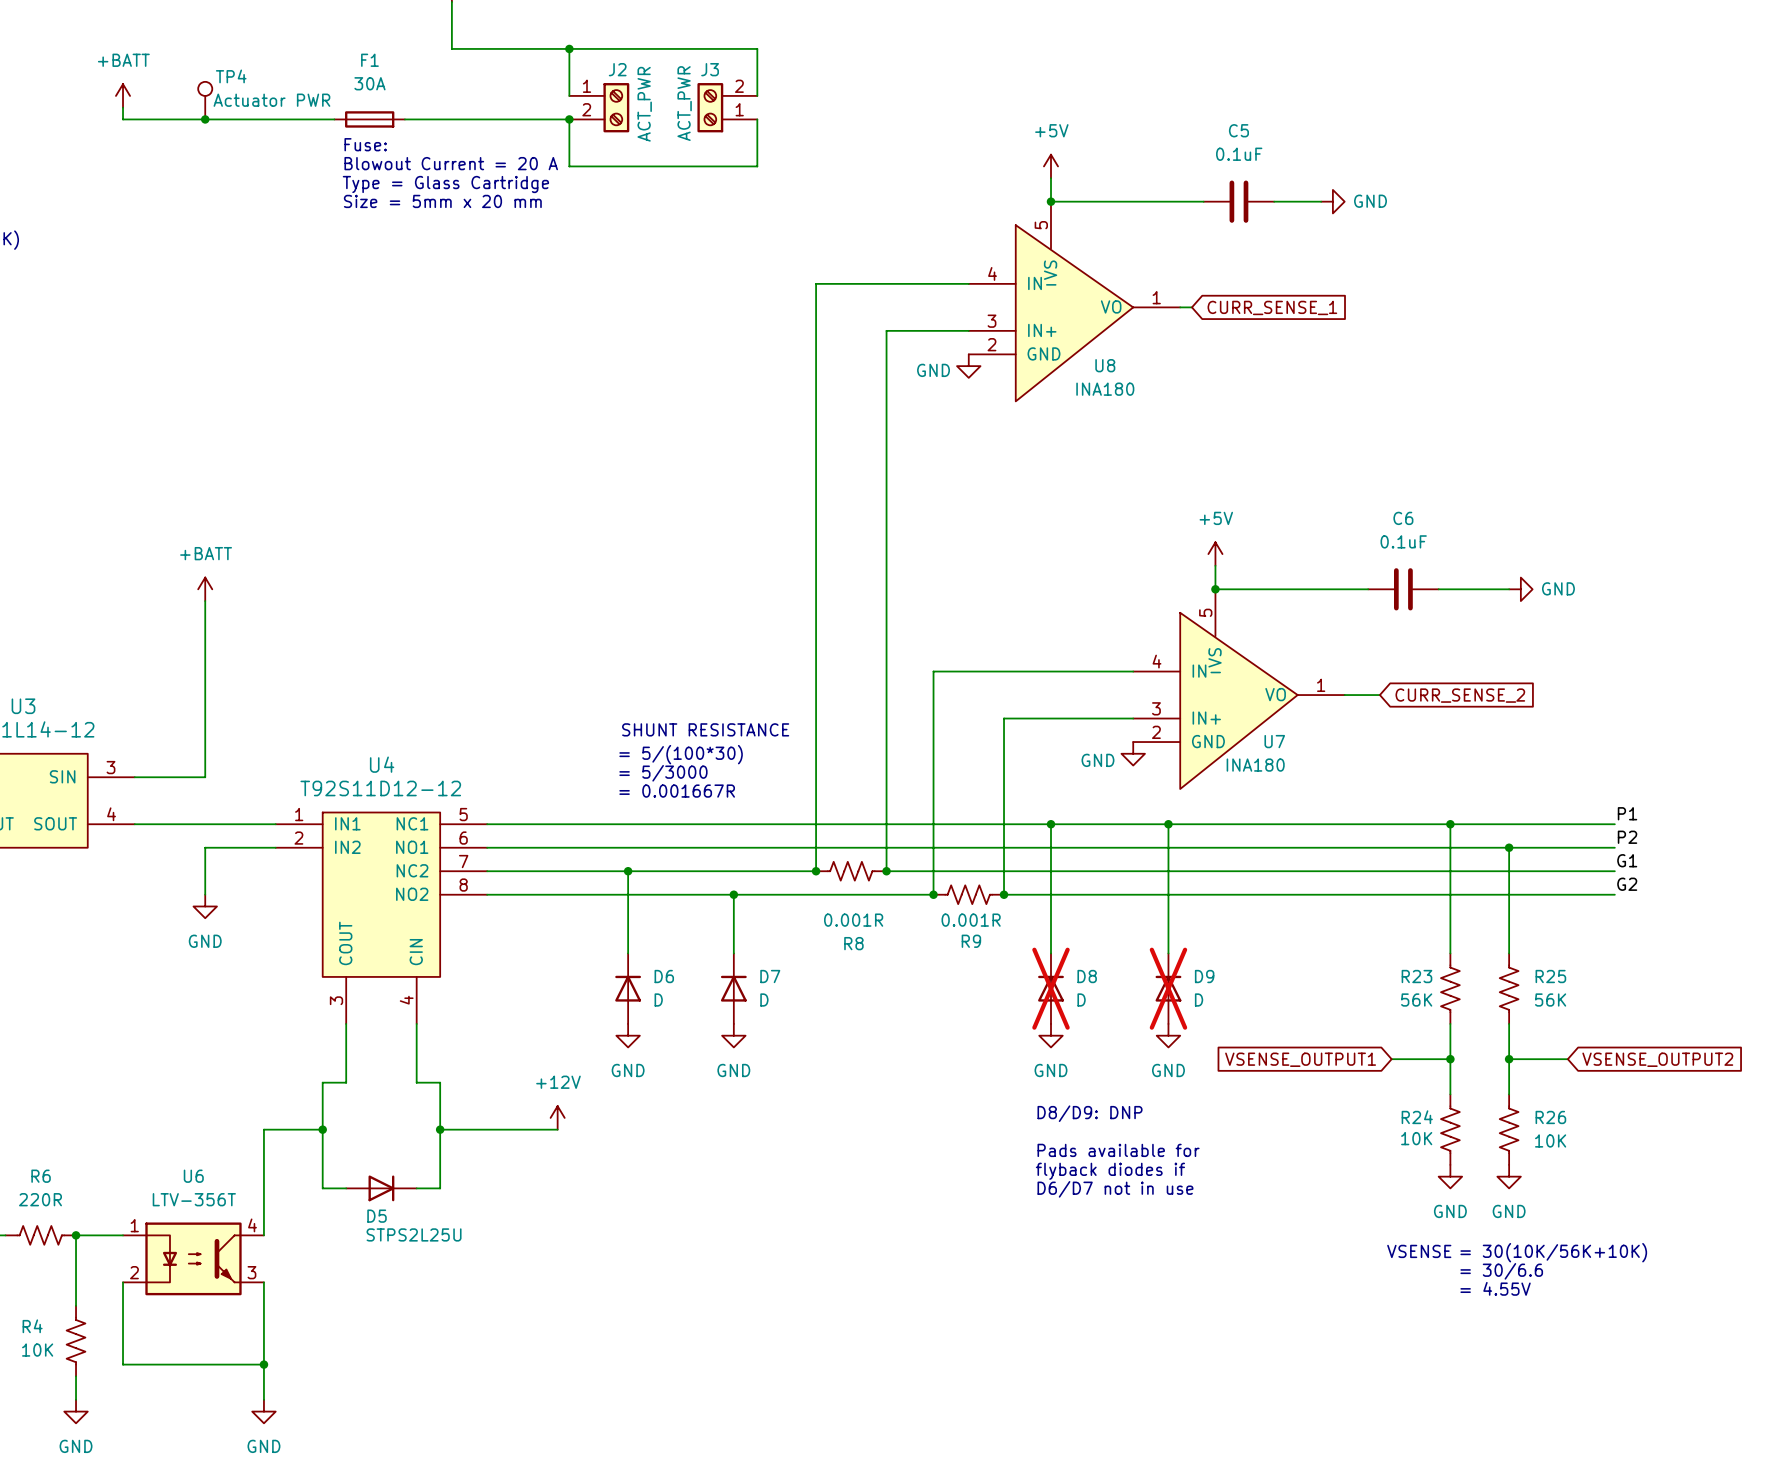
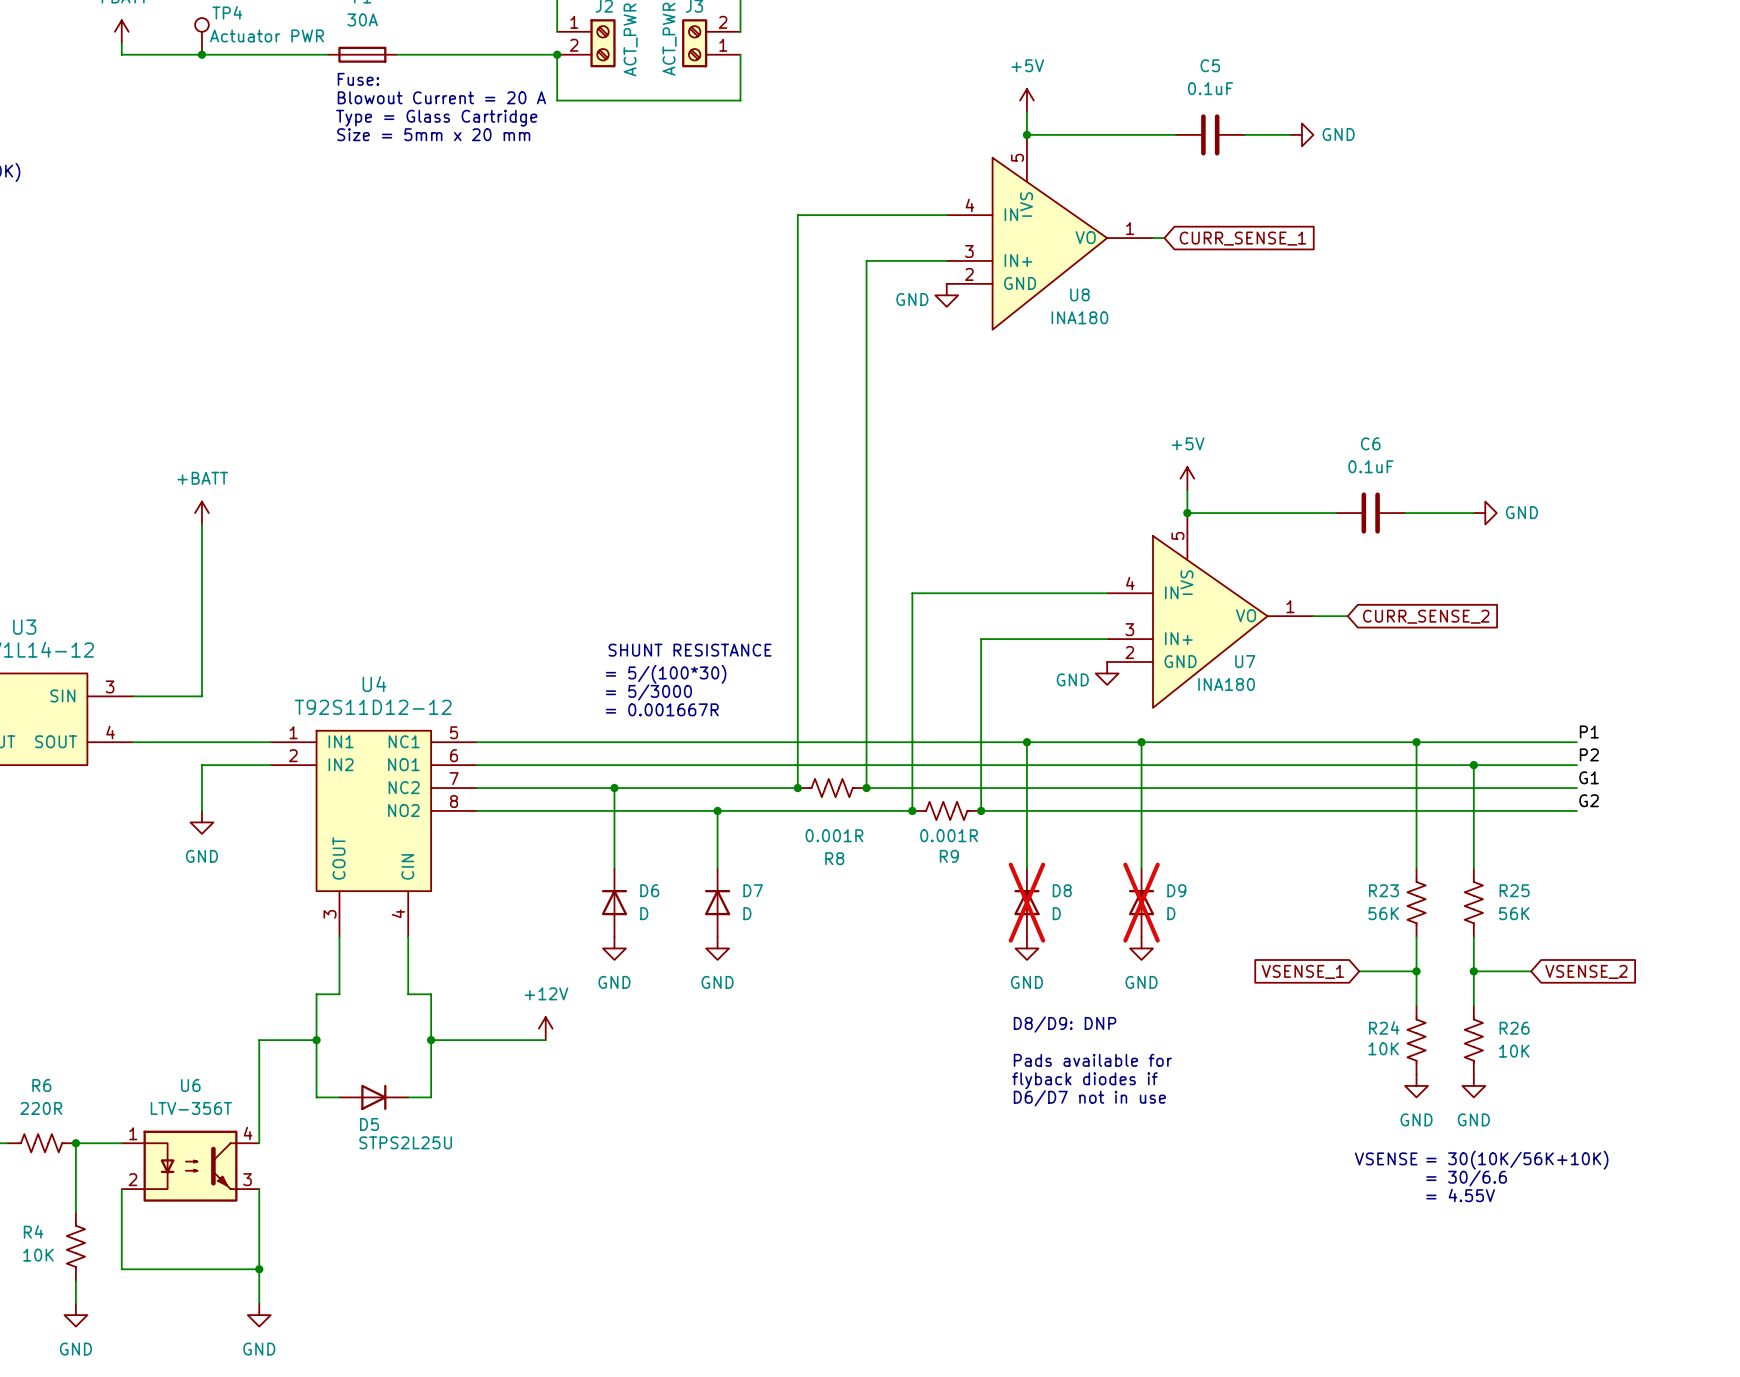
global label: VSENSE_OUTPUT1 (1300, 1059) -> VSENSE_1 (1302, 971)
global label: VSENSE_OUTPUT2 (1657, 1059) -> VSENSE_2 (1586, 971)

